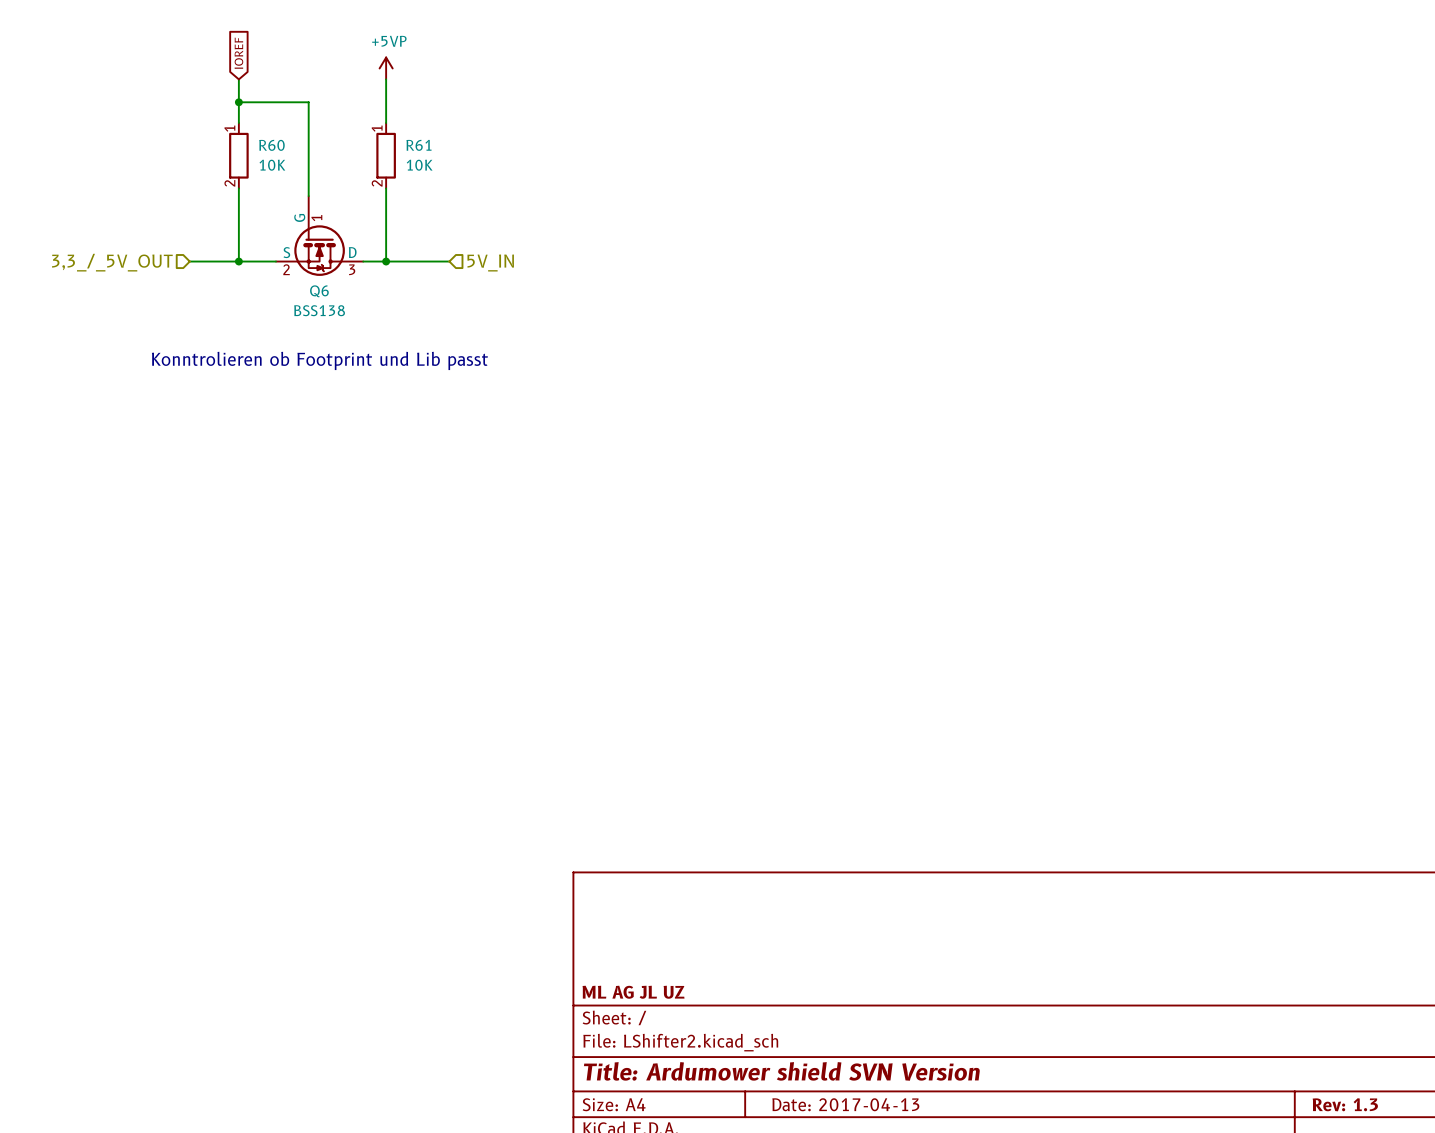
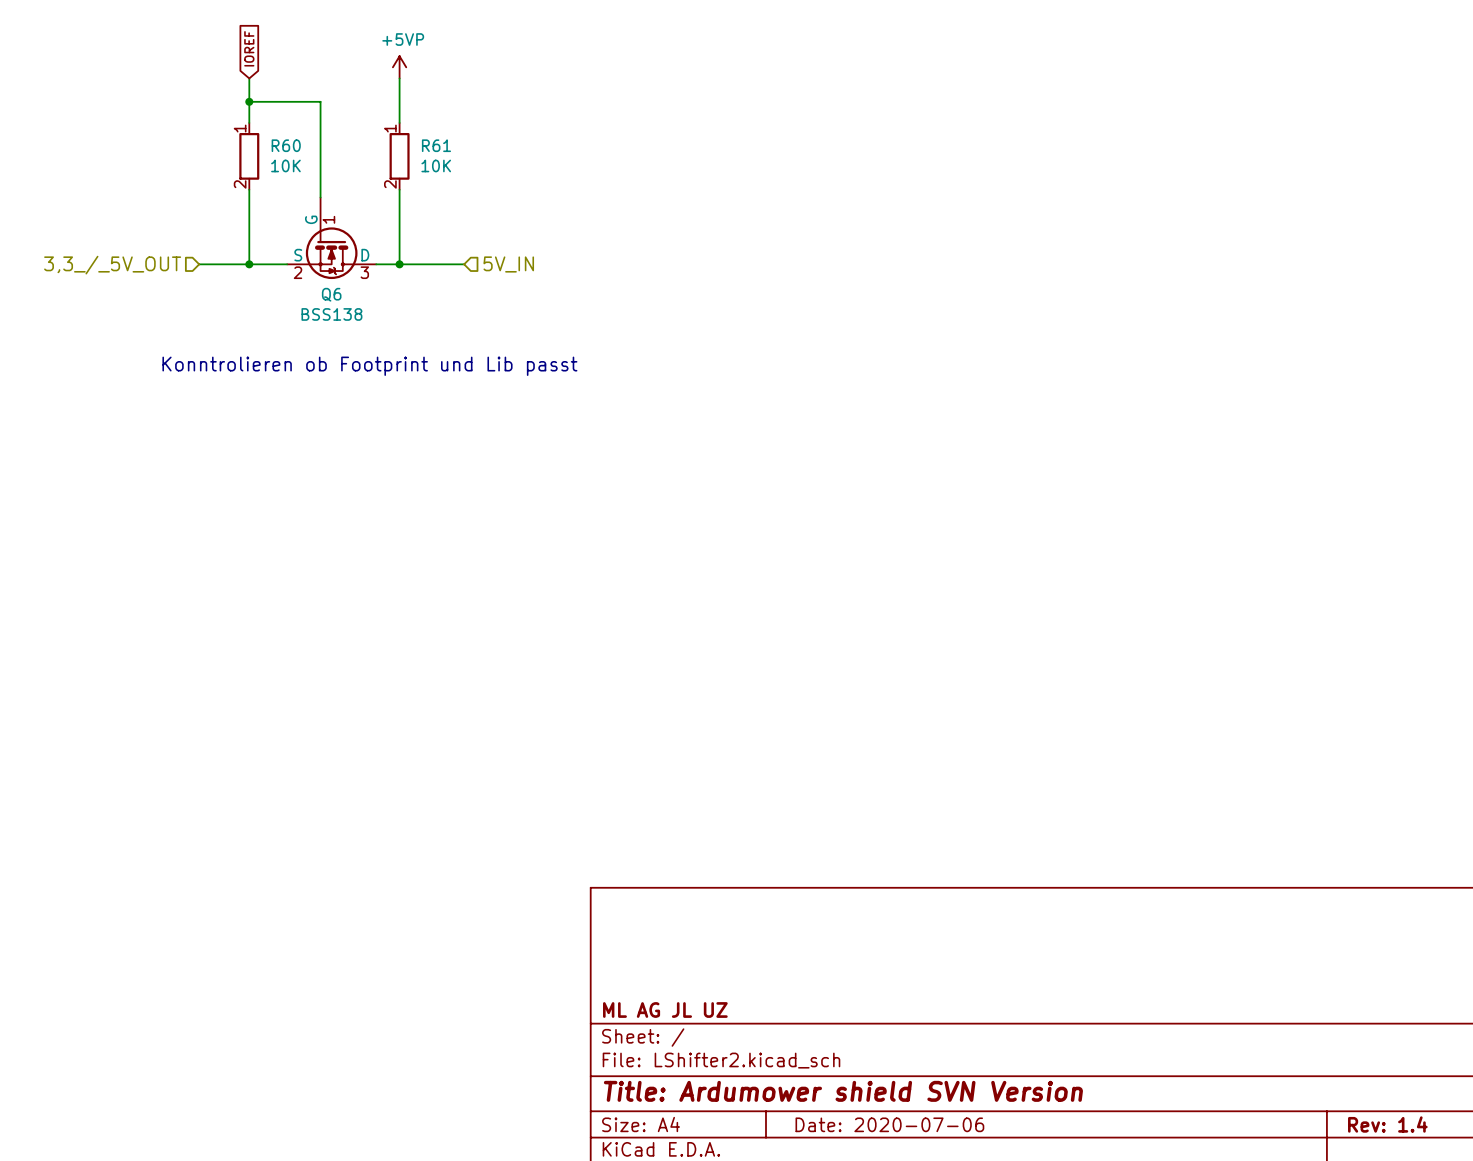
title block: Date: 2017-04-13 (845, 1104) -> Date: 2020-07-06 (889, 1124)
title block: Rev: 1.3 (1345, 1104) -> Rev: 1.4 (1387, 1124)

